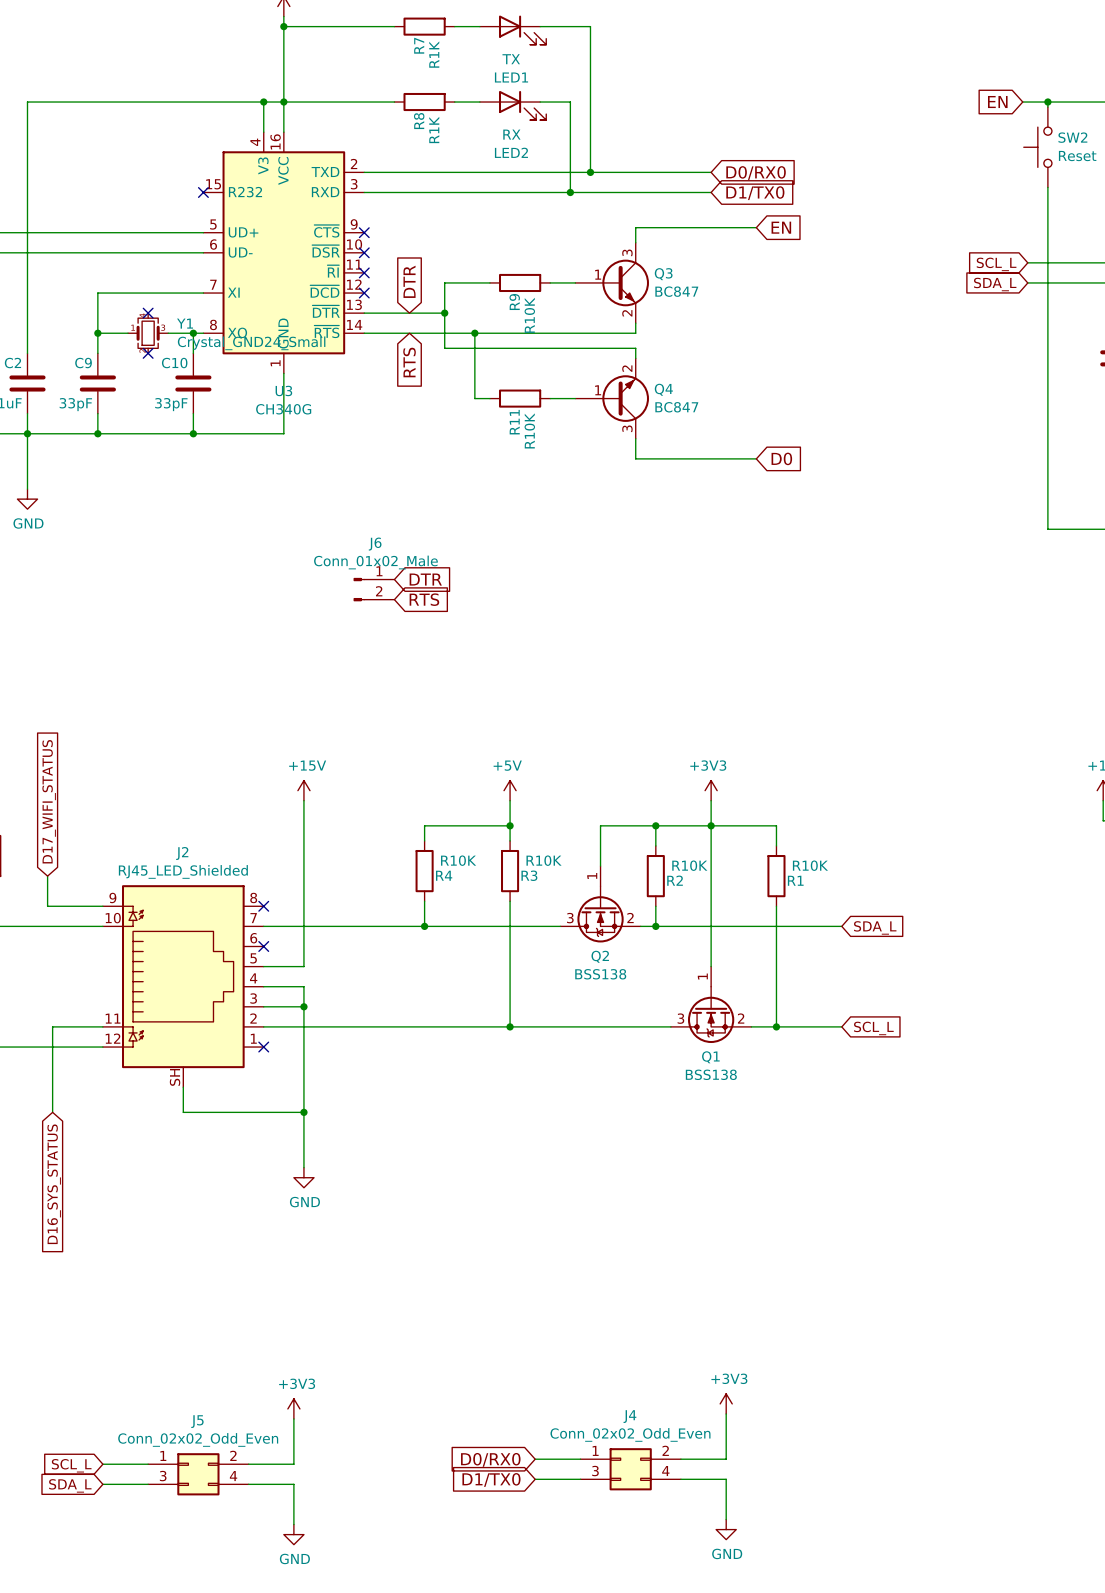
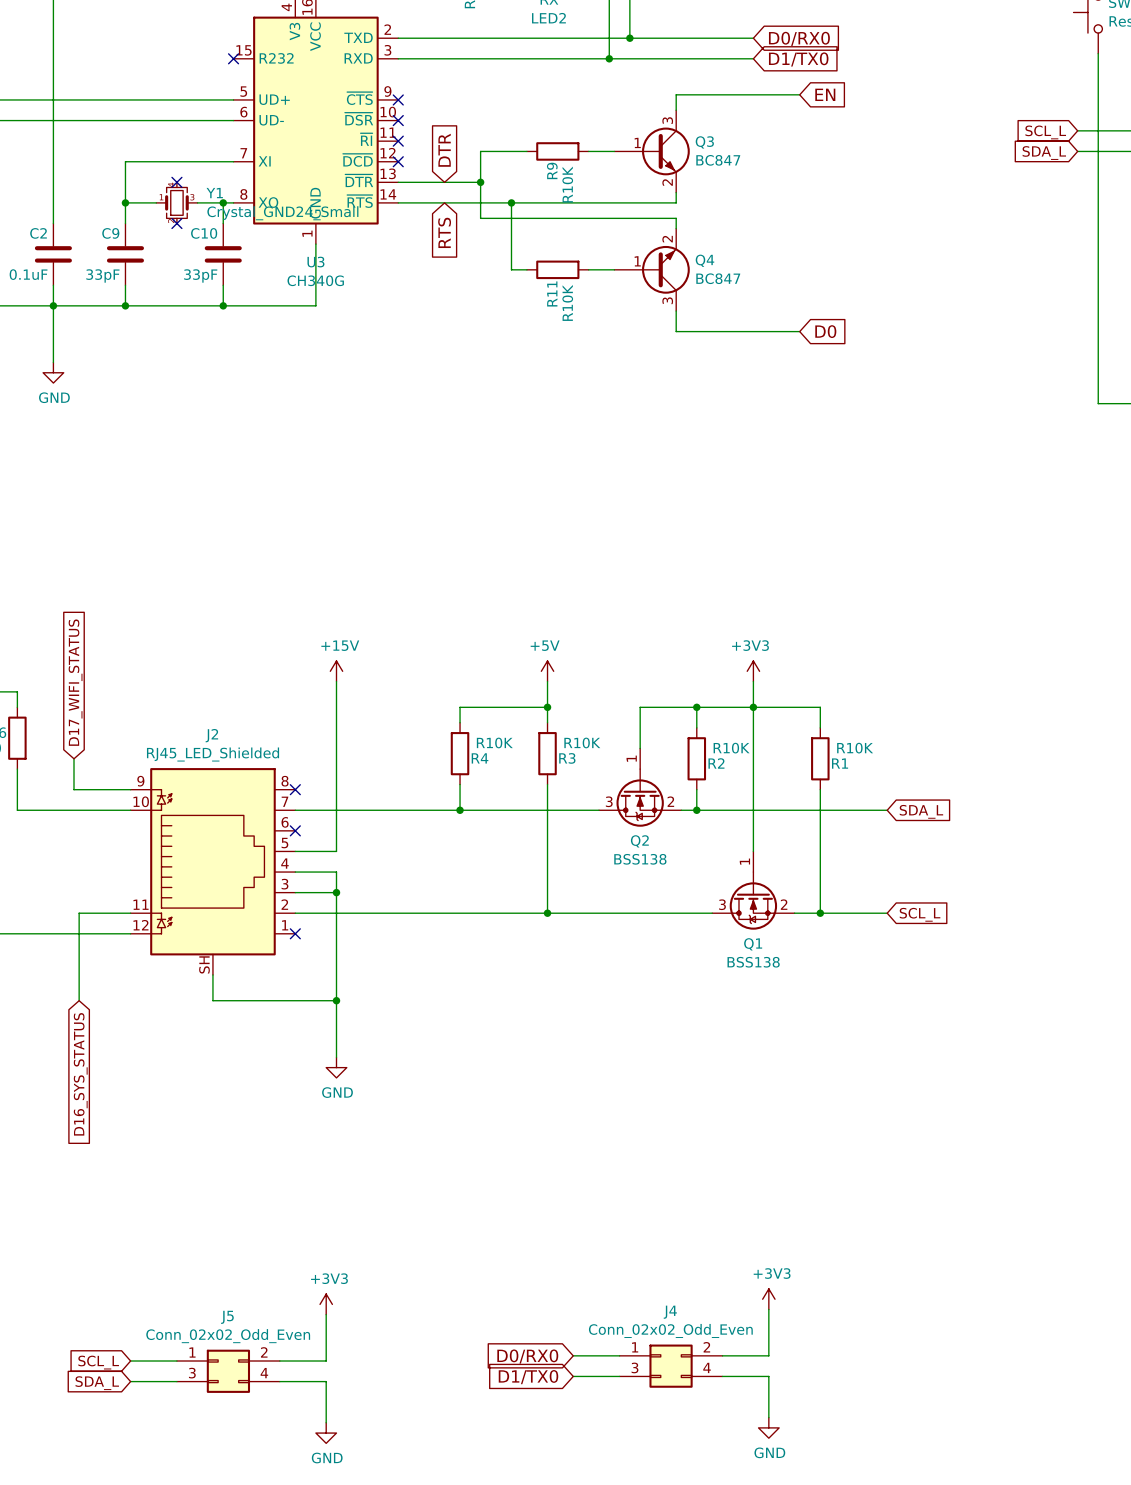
global label: DTR (425, 579) -> none
J6: Conn_01x02_Male (374, 589) -> none
global label: RTS (424, 599) -> none

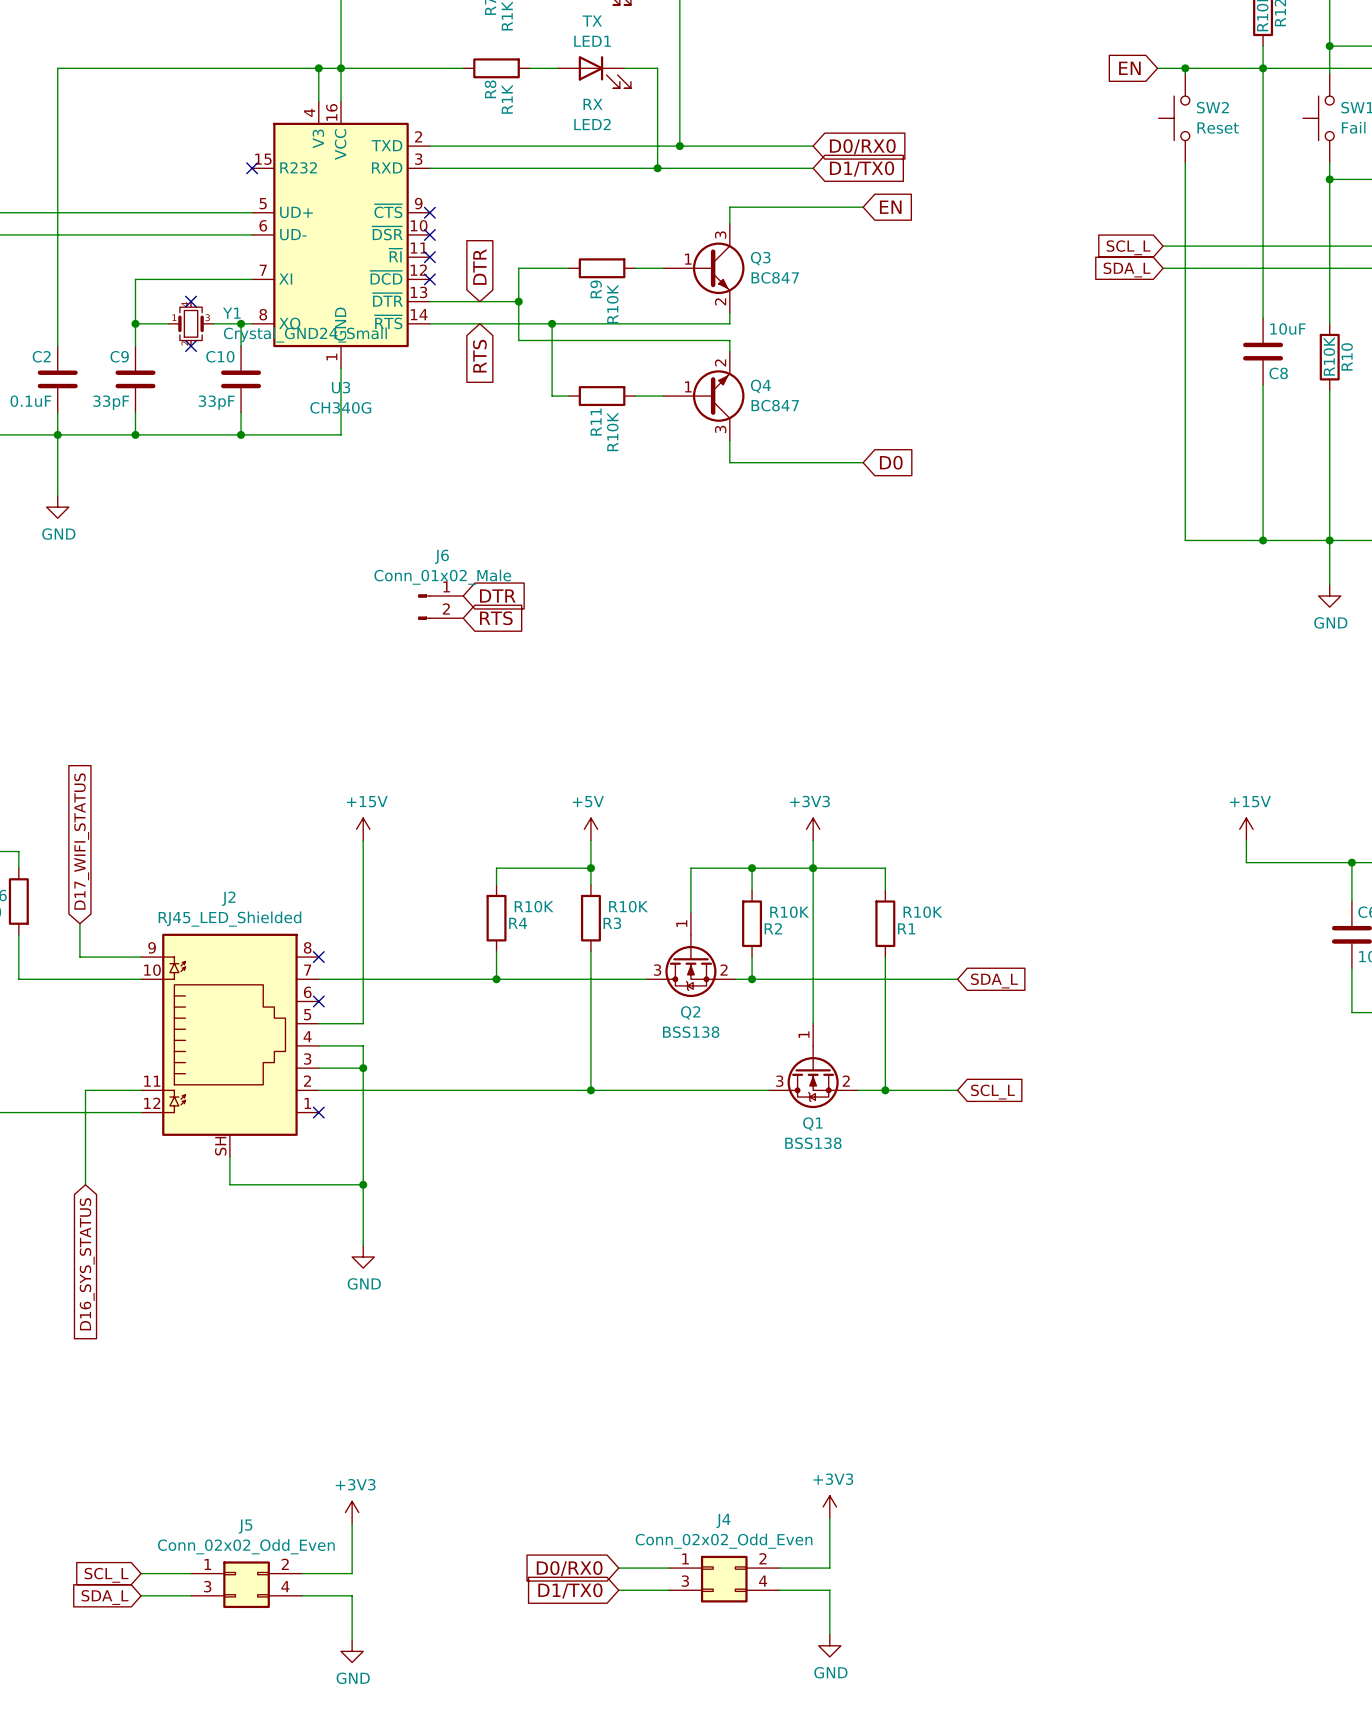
global label: none -> DTR (497, 596)
J6: none -> Conn_01x02_Male (440, 607)
global label: none -> RTS (496, 618)

